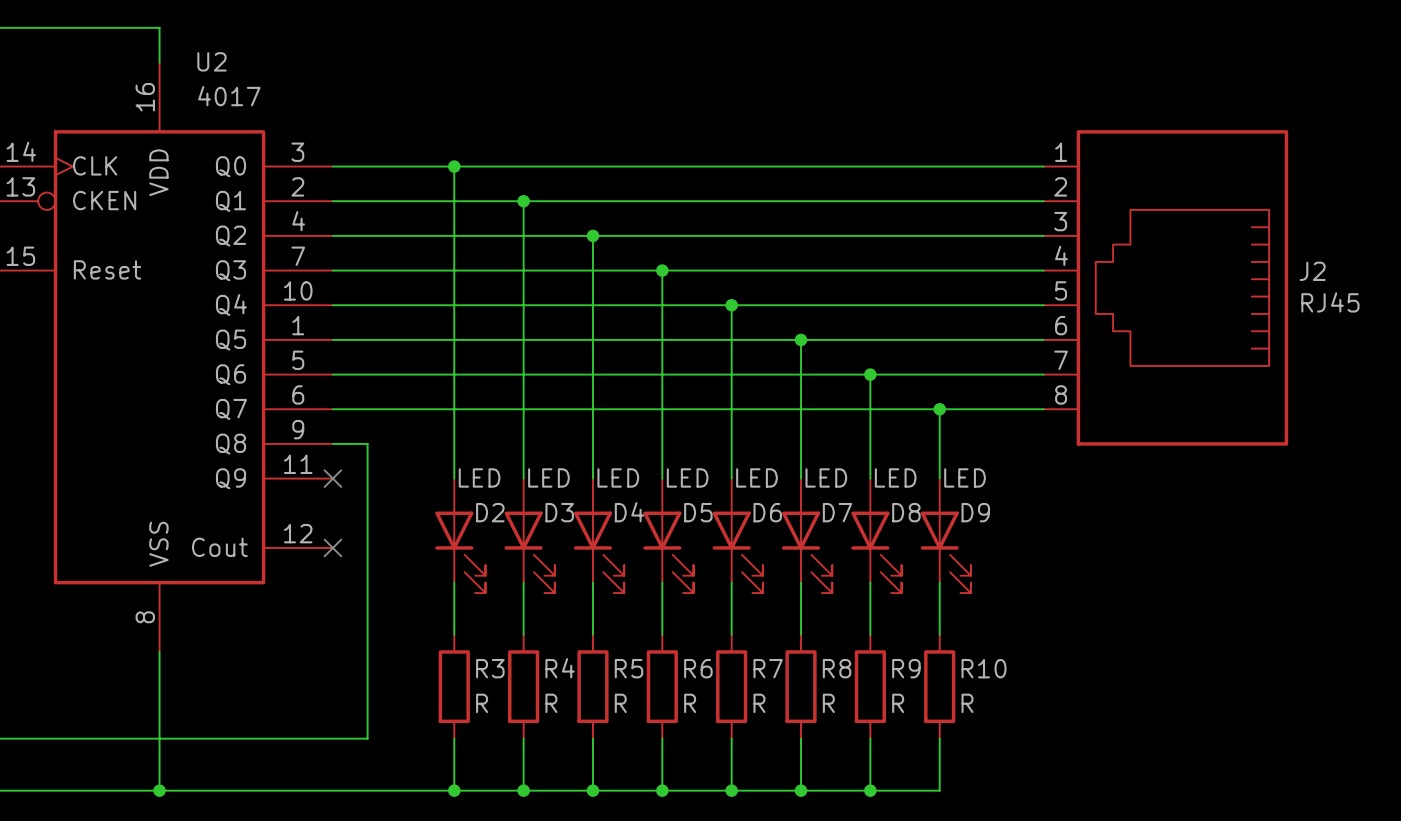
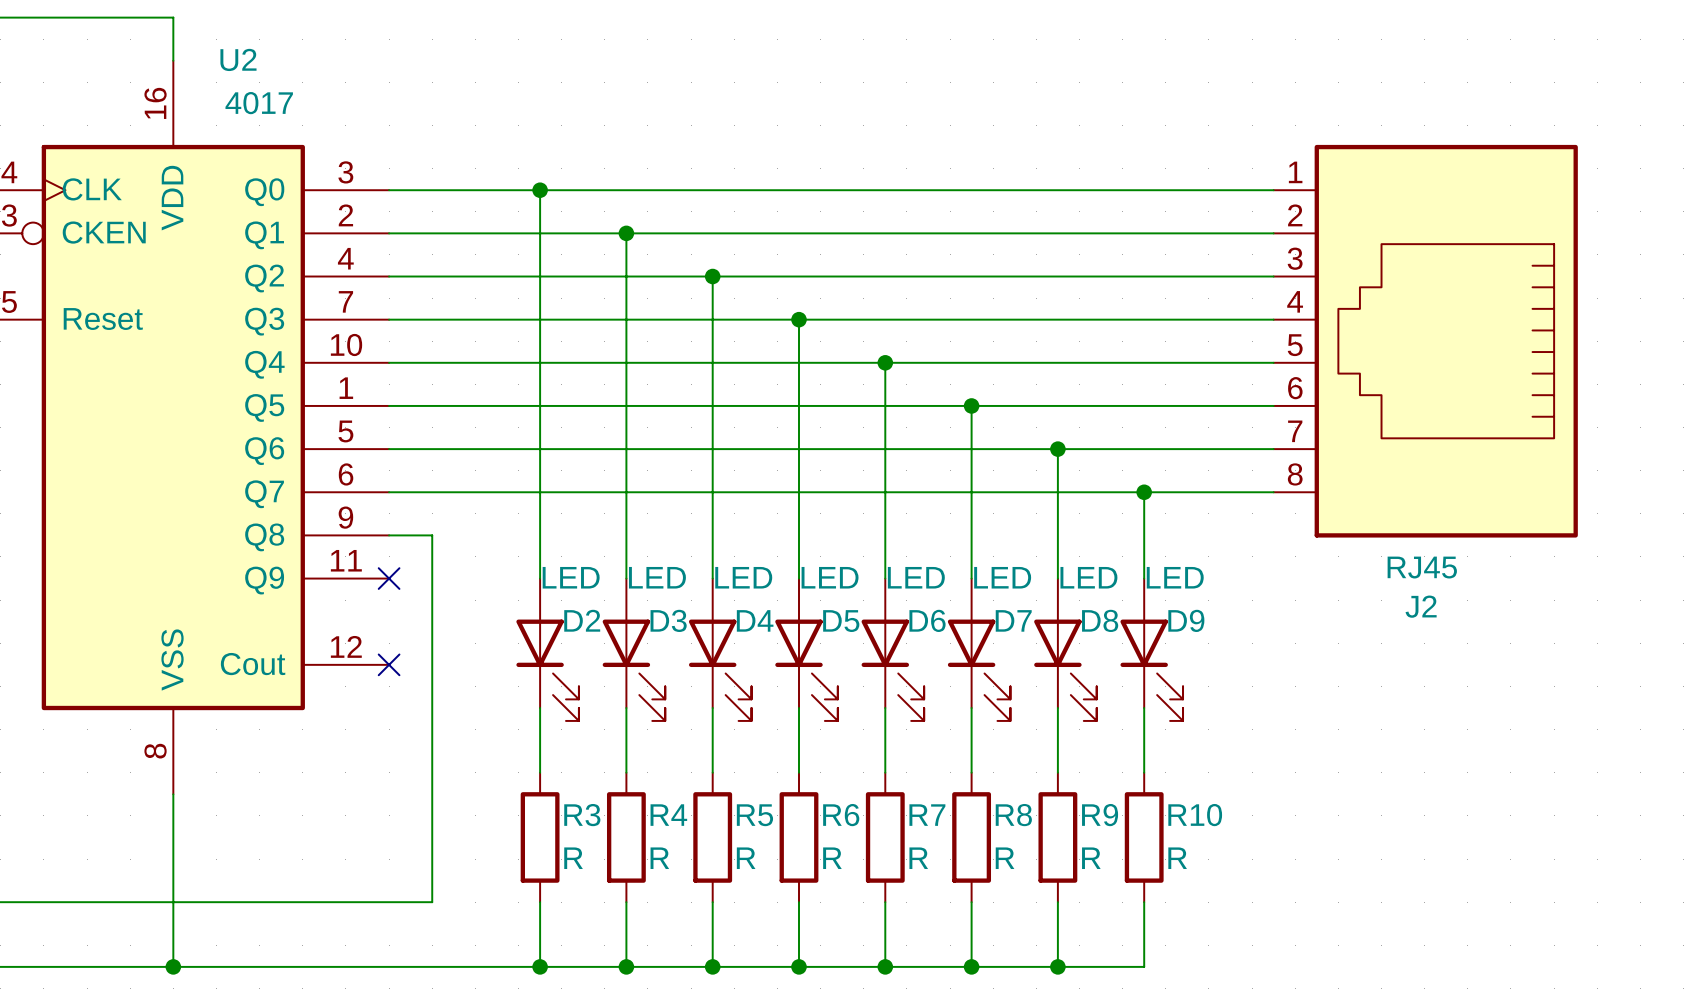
J2 name position: J2 (1312, 271) -> J2 (1421, 606)
J2 value position: RJ45 (1330, 302) -> RJ45 (1422, 567)

